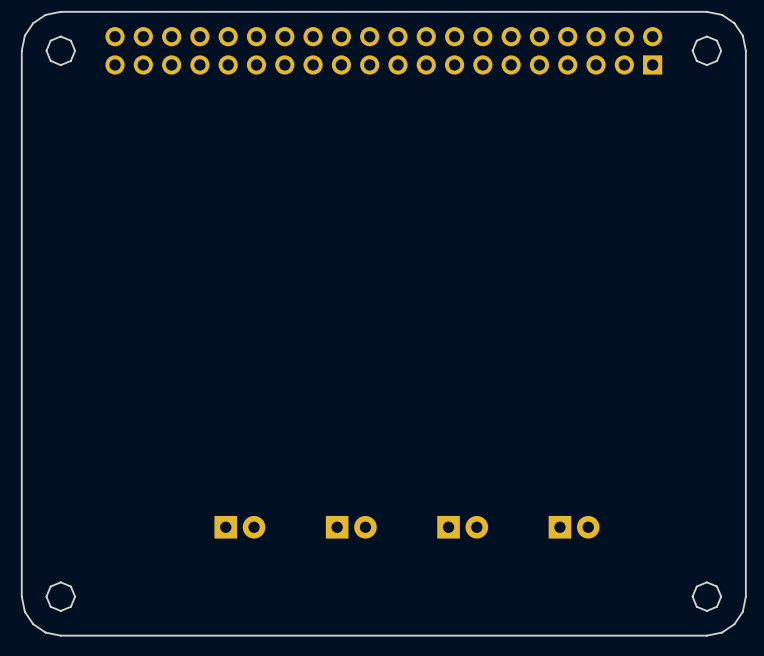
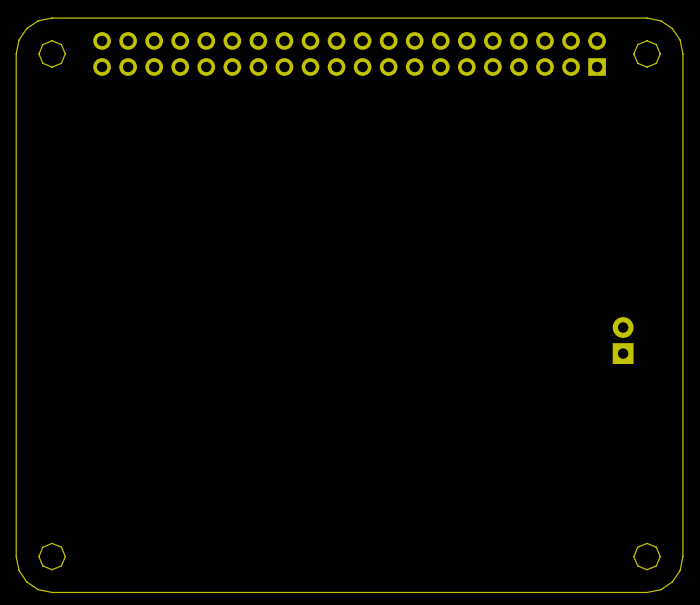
part: none -> (623, 340)
part: (239, 527) -> none
part: (351, 527) -> none
part: (462, 527) -> none
part: (574, 527) -> none

